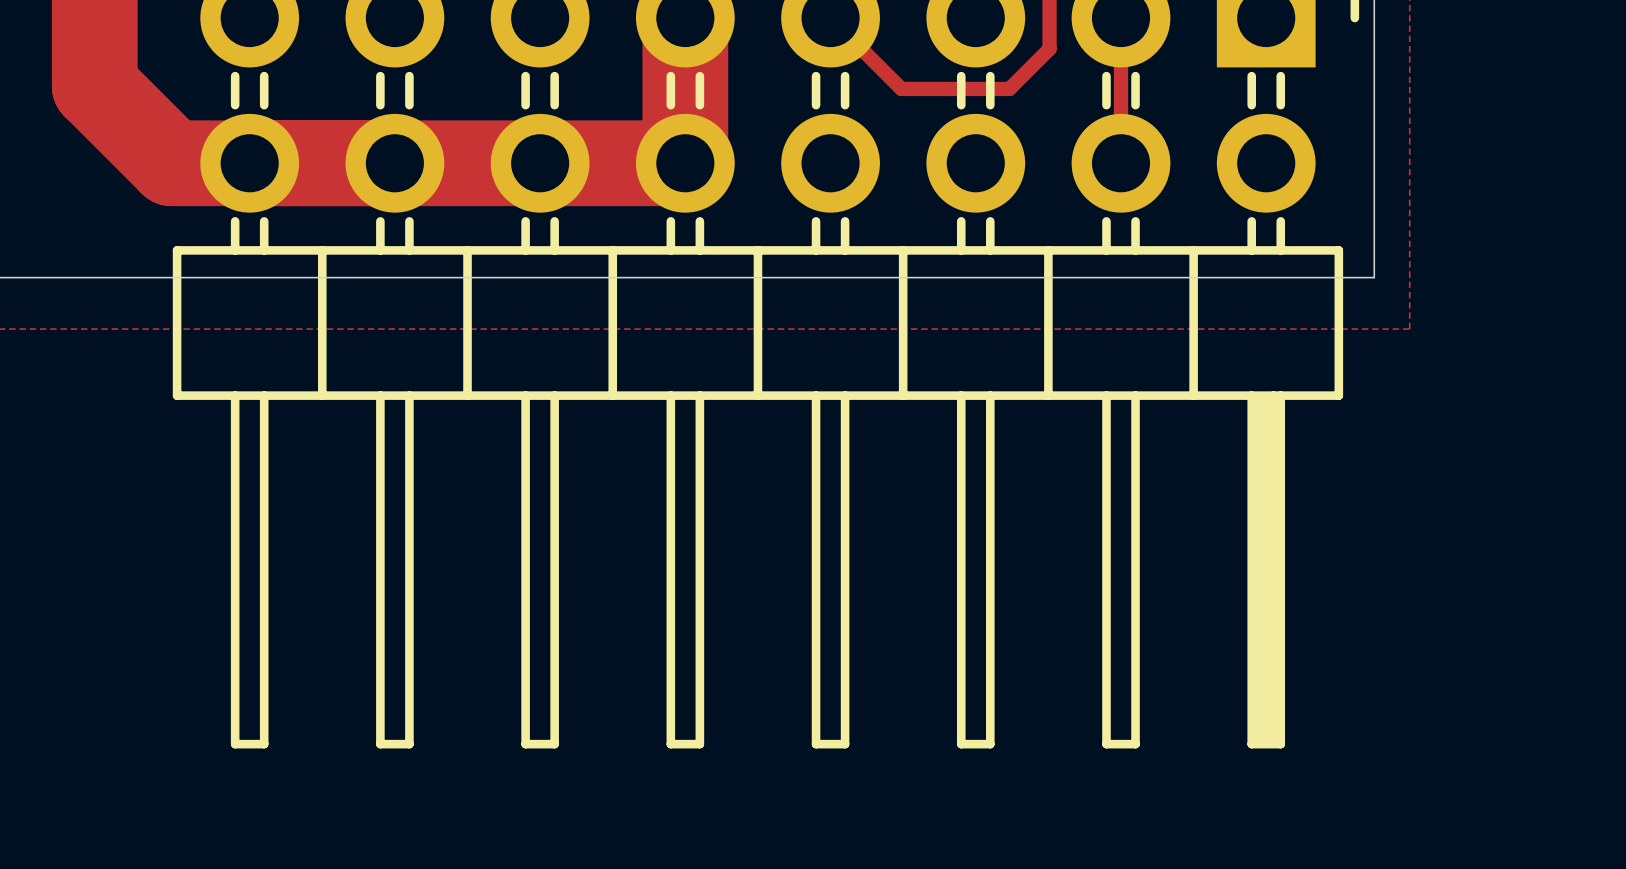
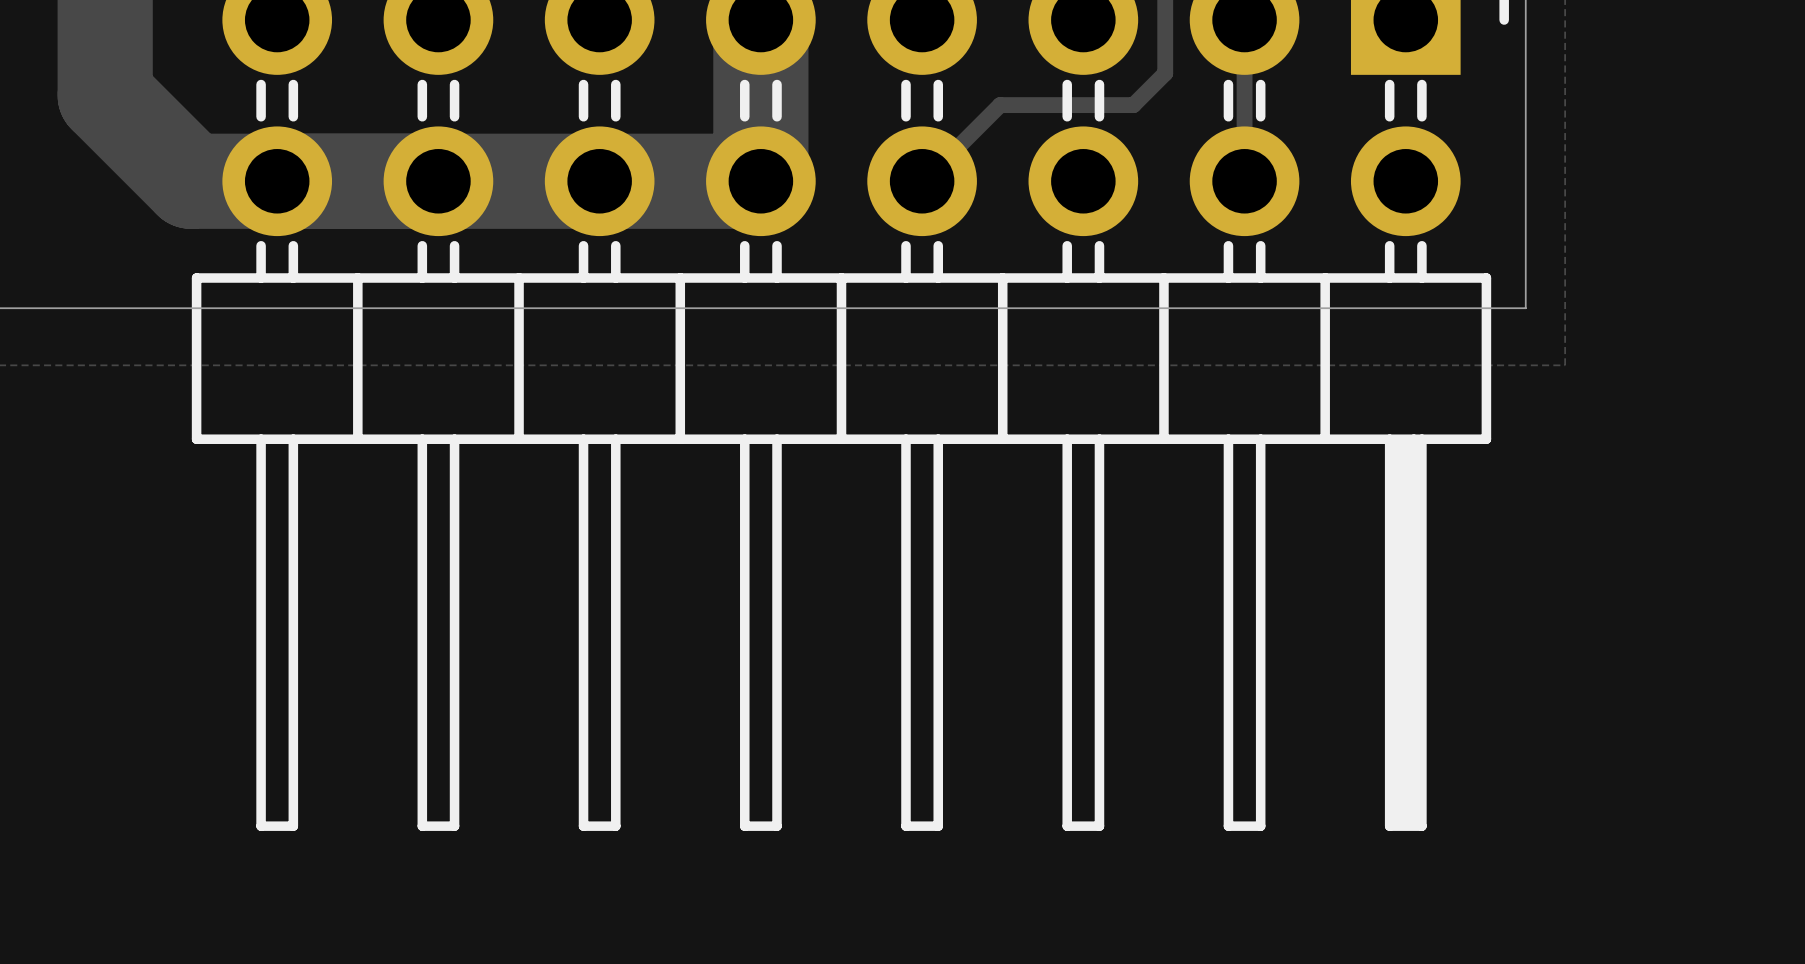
track: (830, 18) (901, 88) (1009, 88) (1049, 48) -> (924, 181) (1000, 105) (1133, 105) (1165, 73) (1165, 54)

